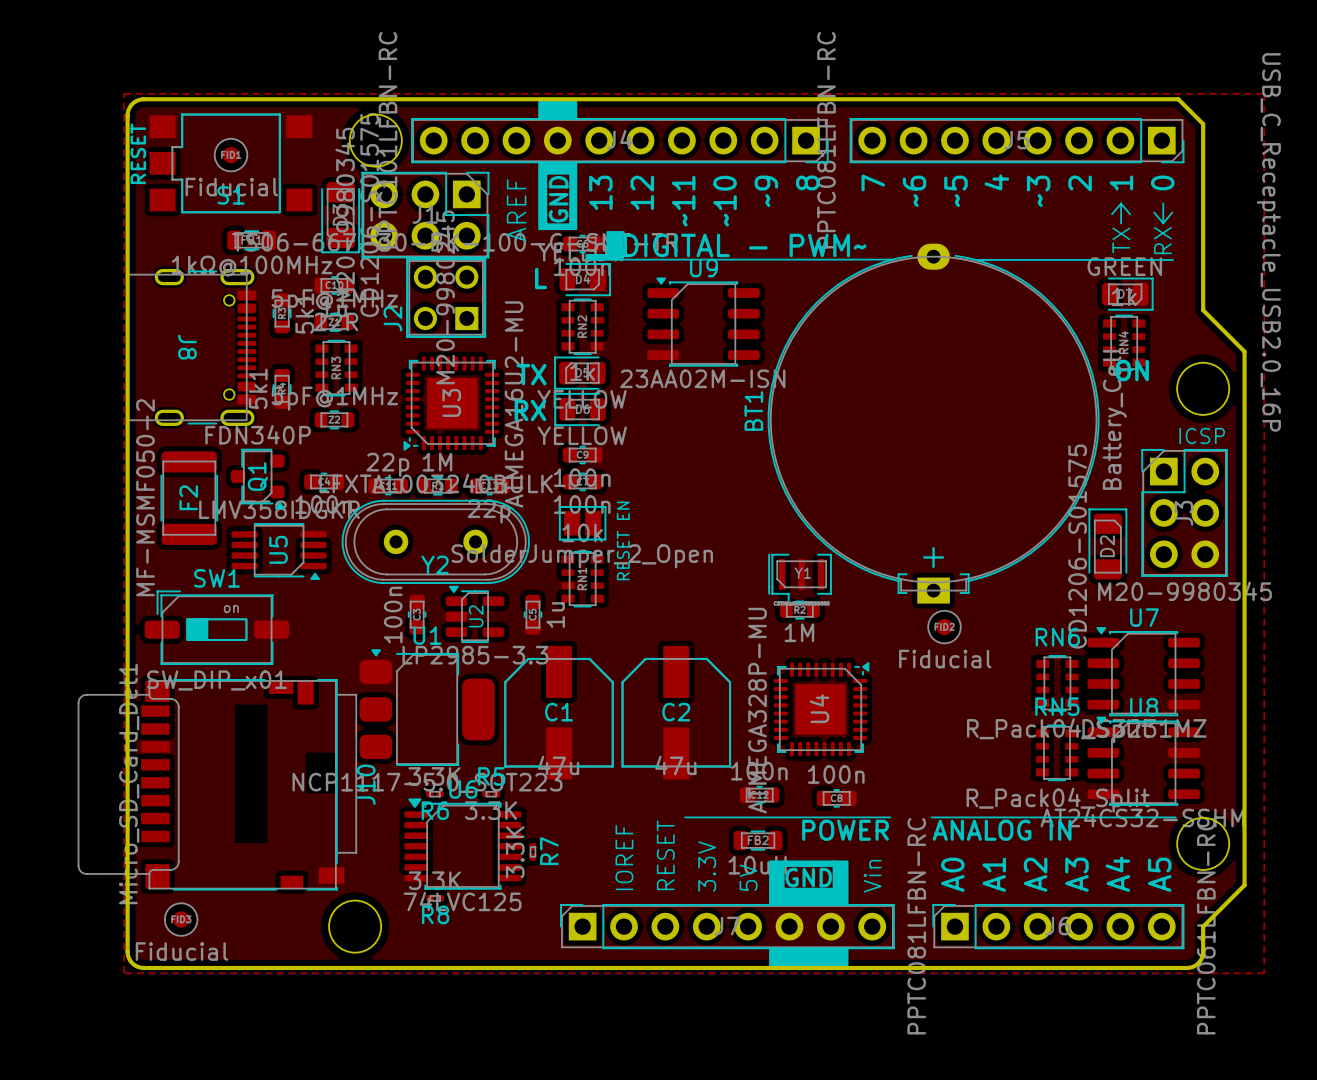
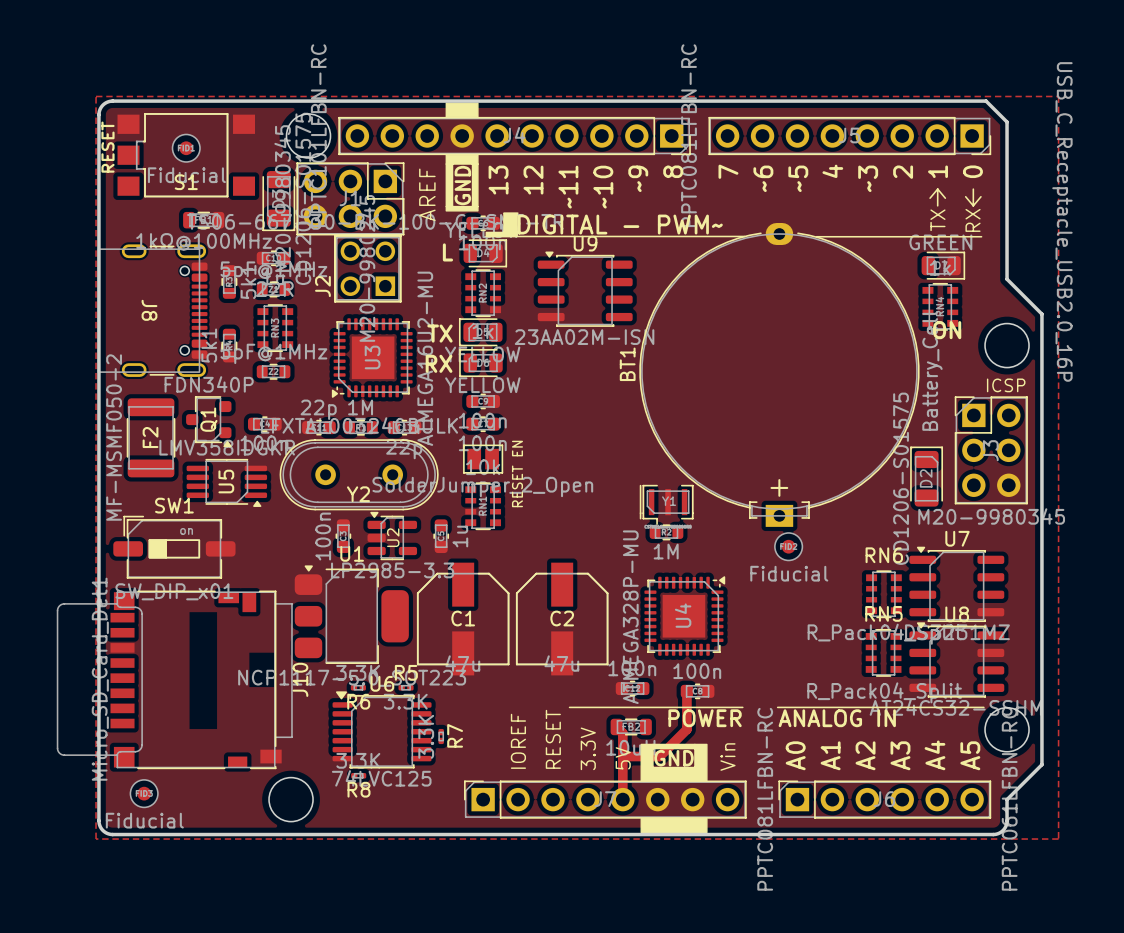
track: none -> (686, 691) (686, 729) (659, 756) (622, 756)
track: none -> (616, 726) (622, 733) (622, 799)

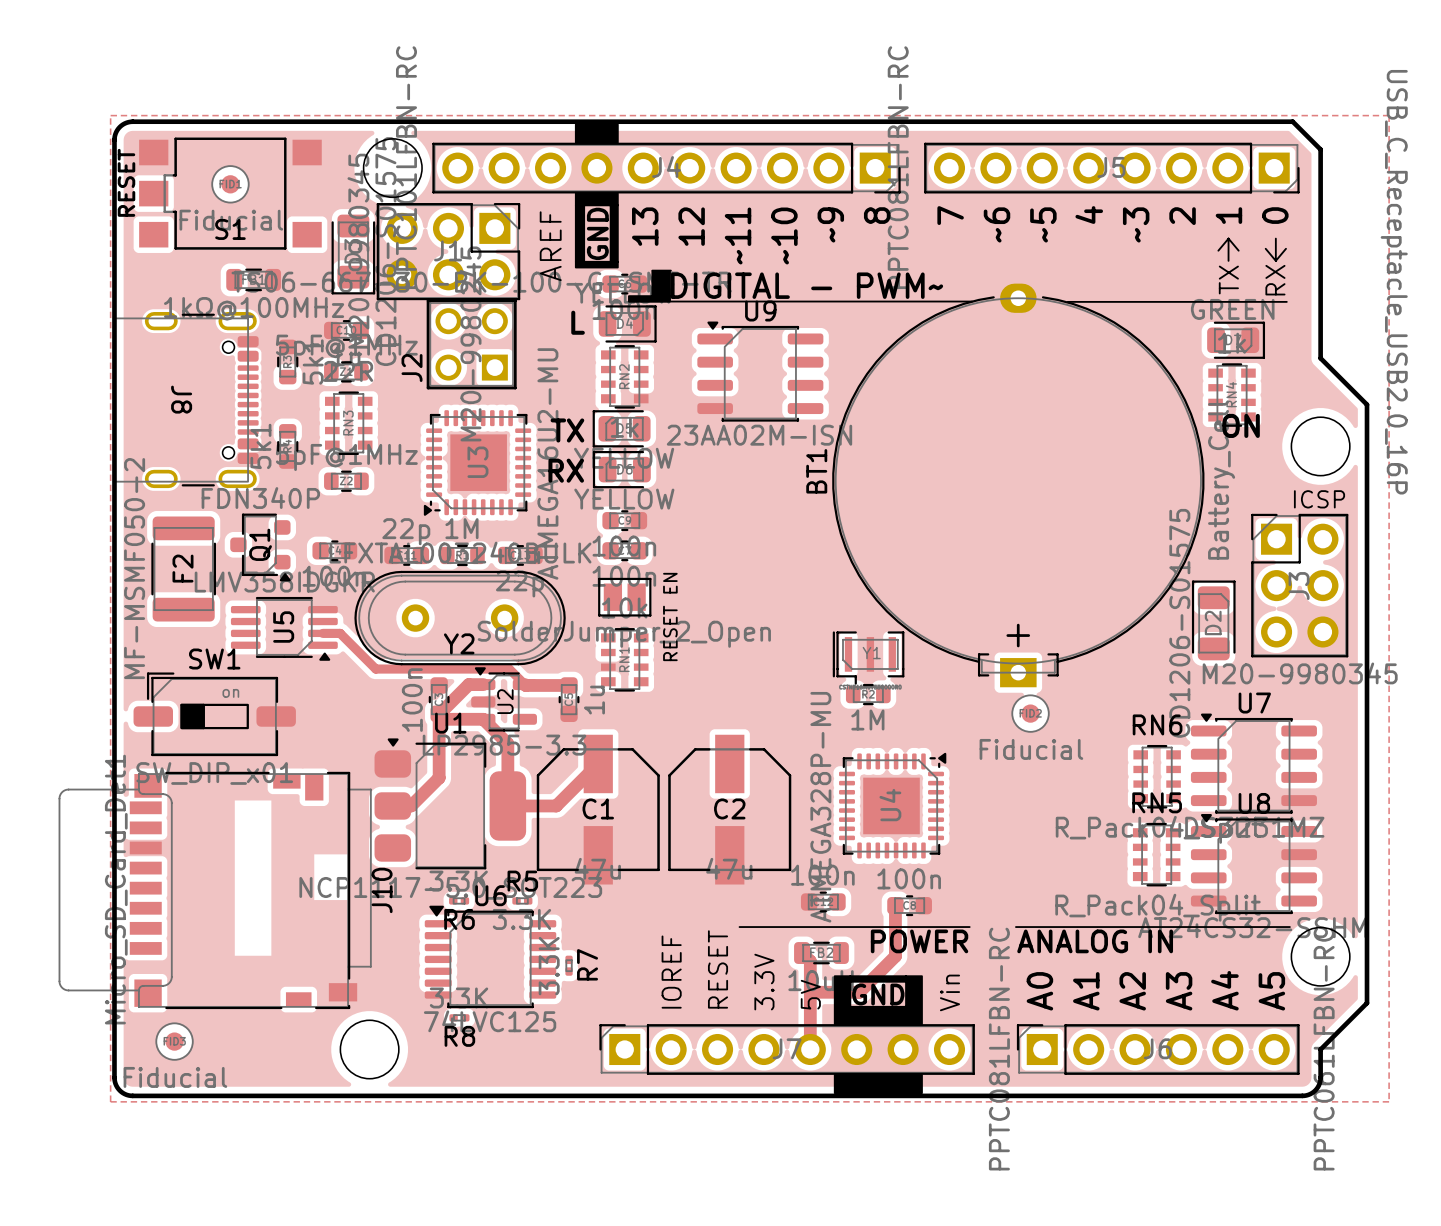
track: none -> (322, 633) (340, 633) (375, 669) (509, 669) (525, 685) (569, 685)
track: none -> (483, 684) (468, 684) (439, 713)
track: none -> (439, 713) (439, 777) (411, 805) (392, 805)
track: none -> (439, 713) (444, 719) (483, 719) (507, 743) (507, 805) (556, 805) (598, 763)

